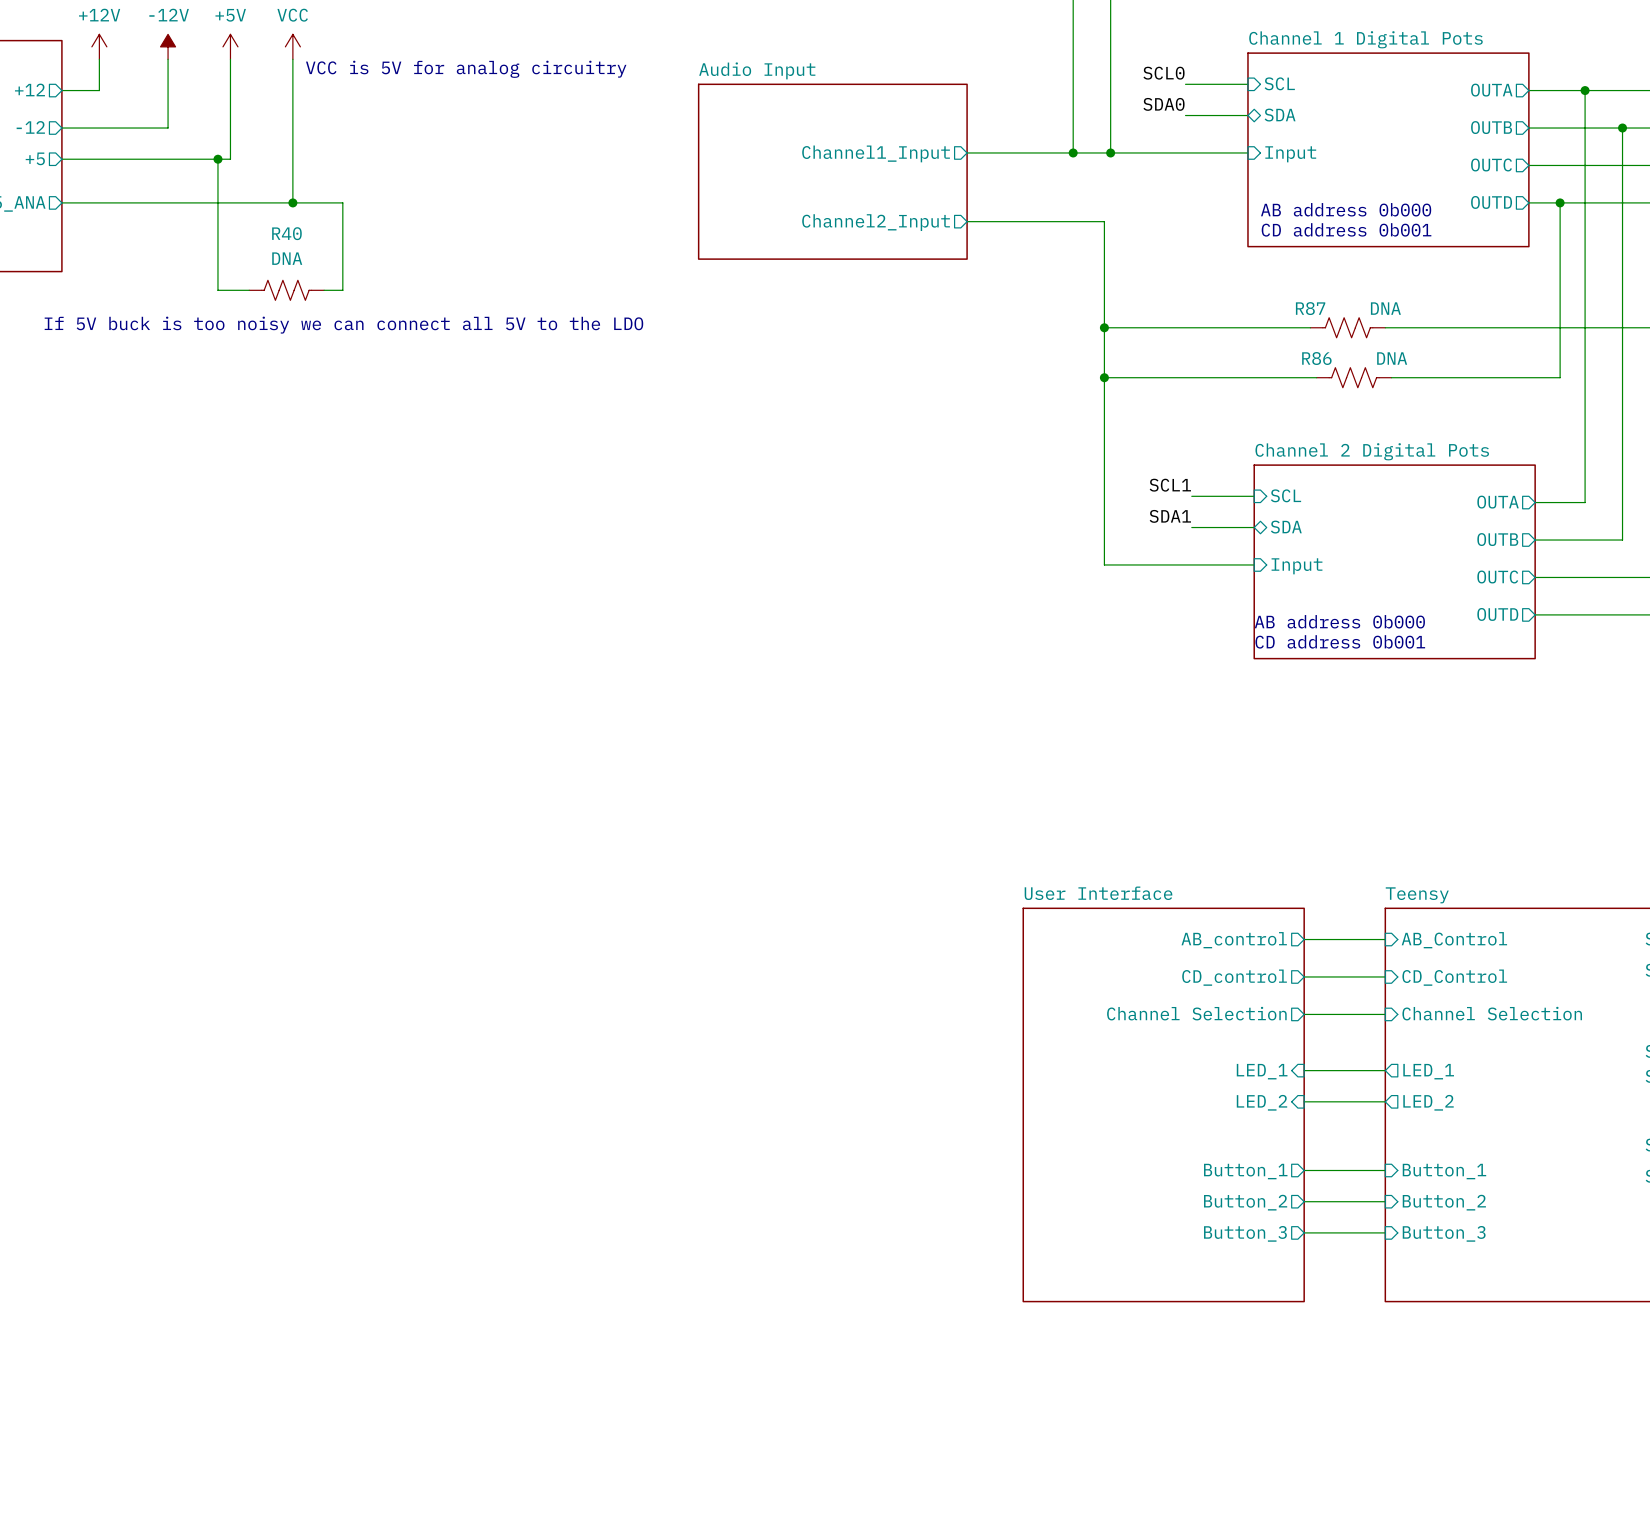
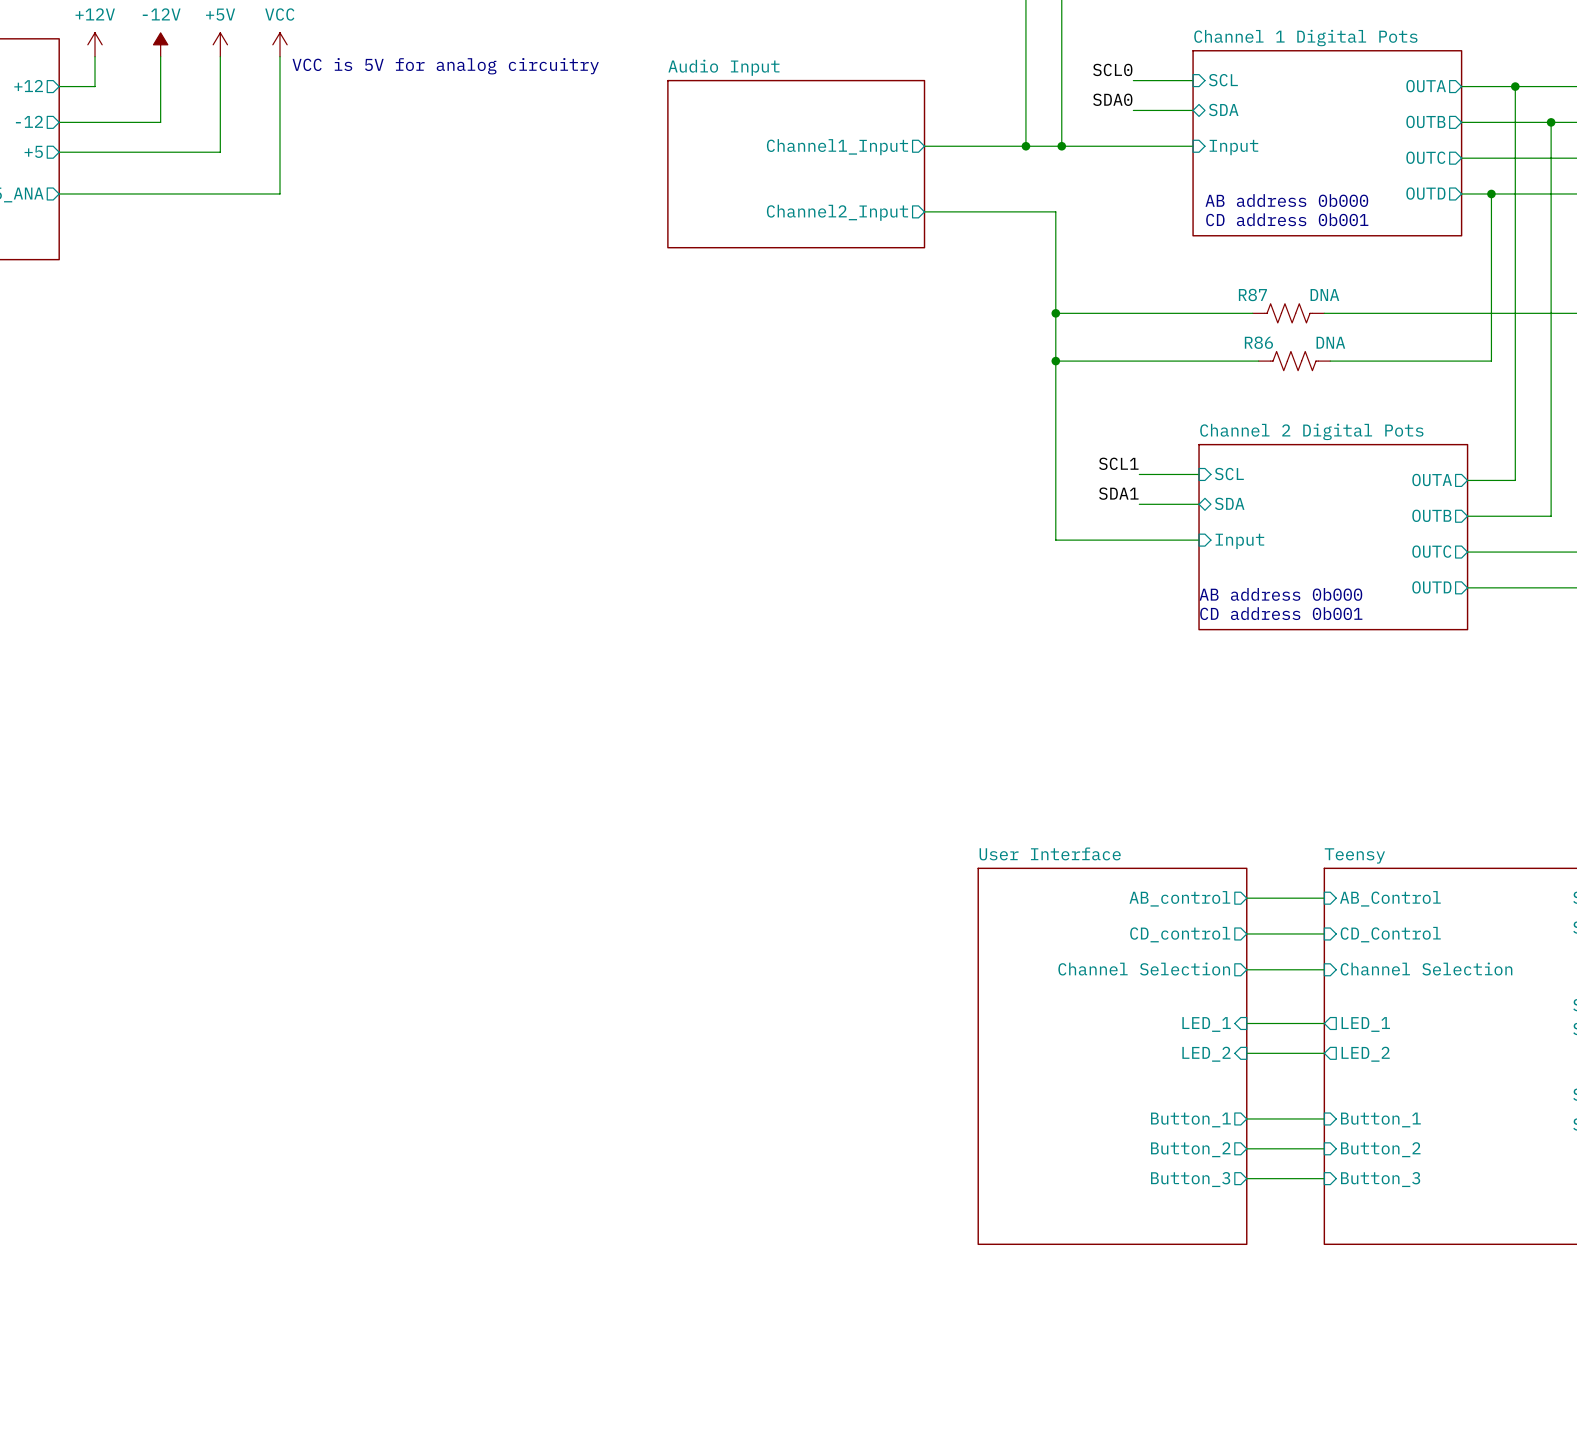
wire: (217, 159) (217, 290) (249, 290) -> none
junction: (217, 159) -> none
wire: (292, 202) (342, 202) (342, 290) (324, 290) -> none
junction: (292, 202) -> none
R40: DNA (286, 290) -> none
text: If 5V buck is too noisy we can connect all 5V to the LDO (343, 325) -> none

